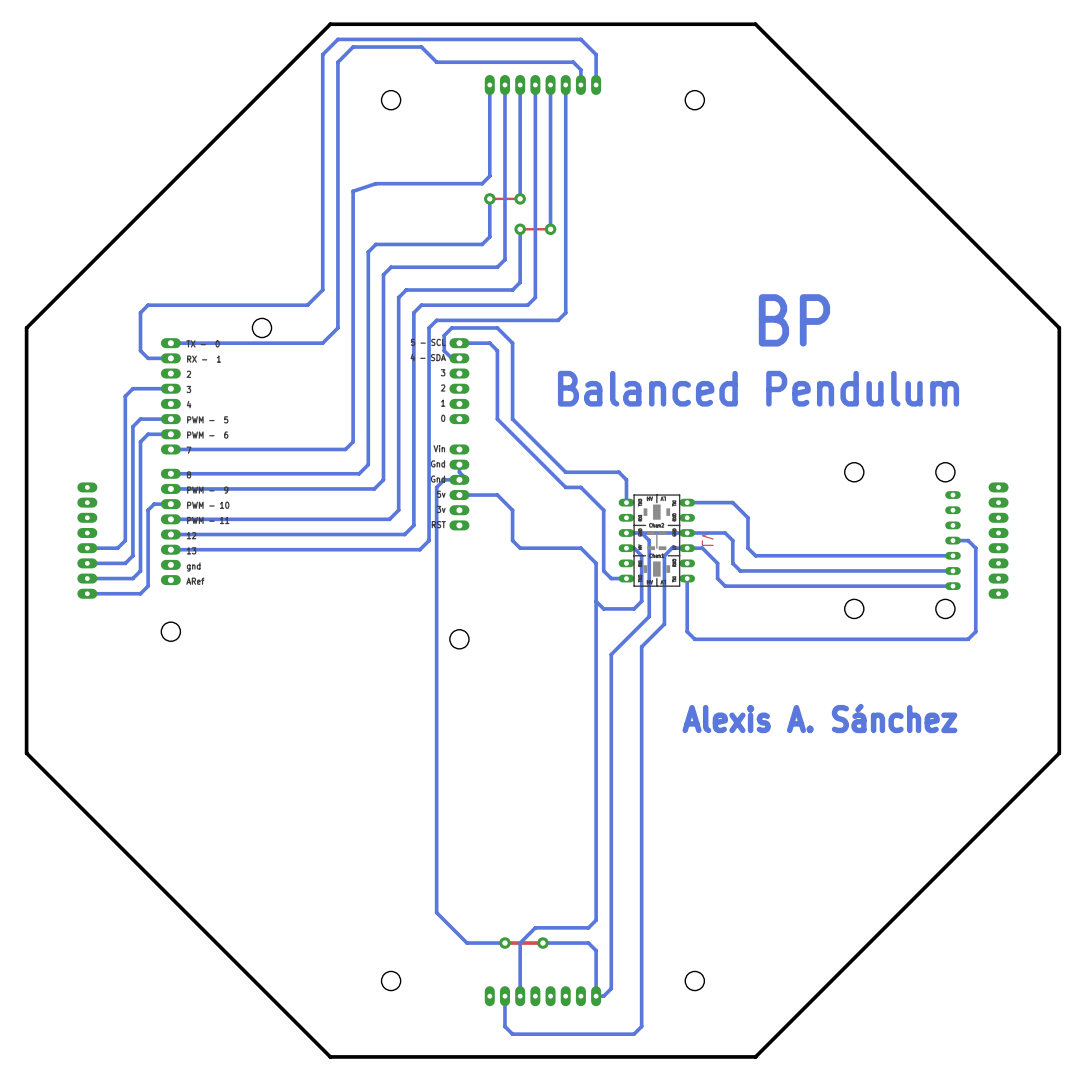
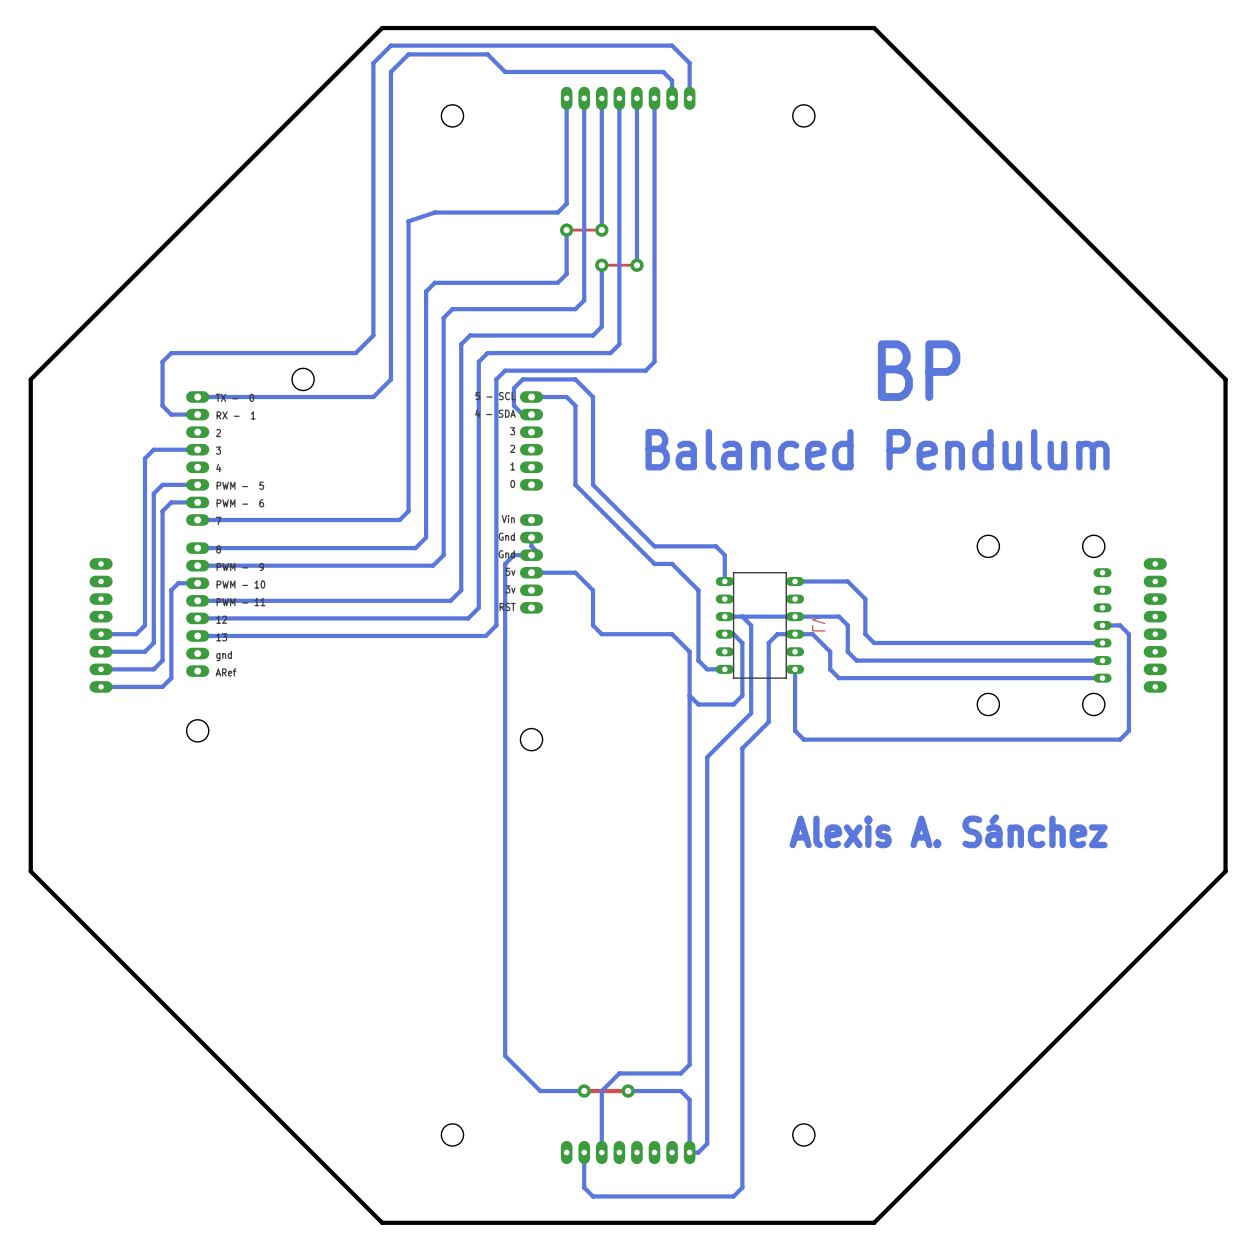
part footprint: [618, 494, 696, 587] -> [715, 572, 805, 679]

